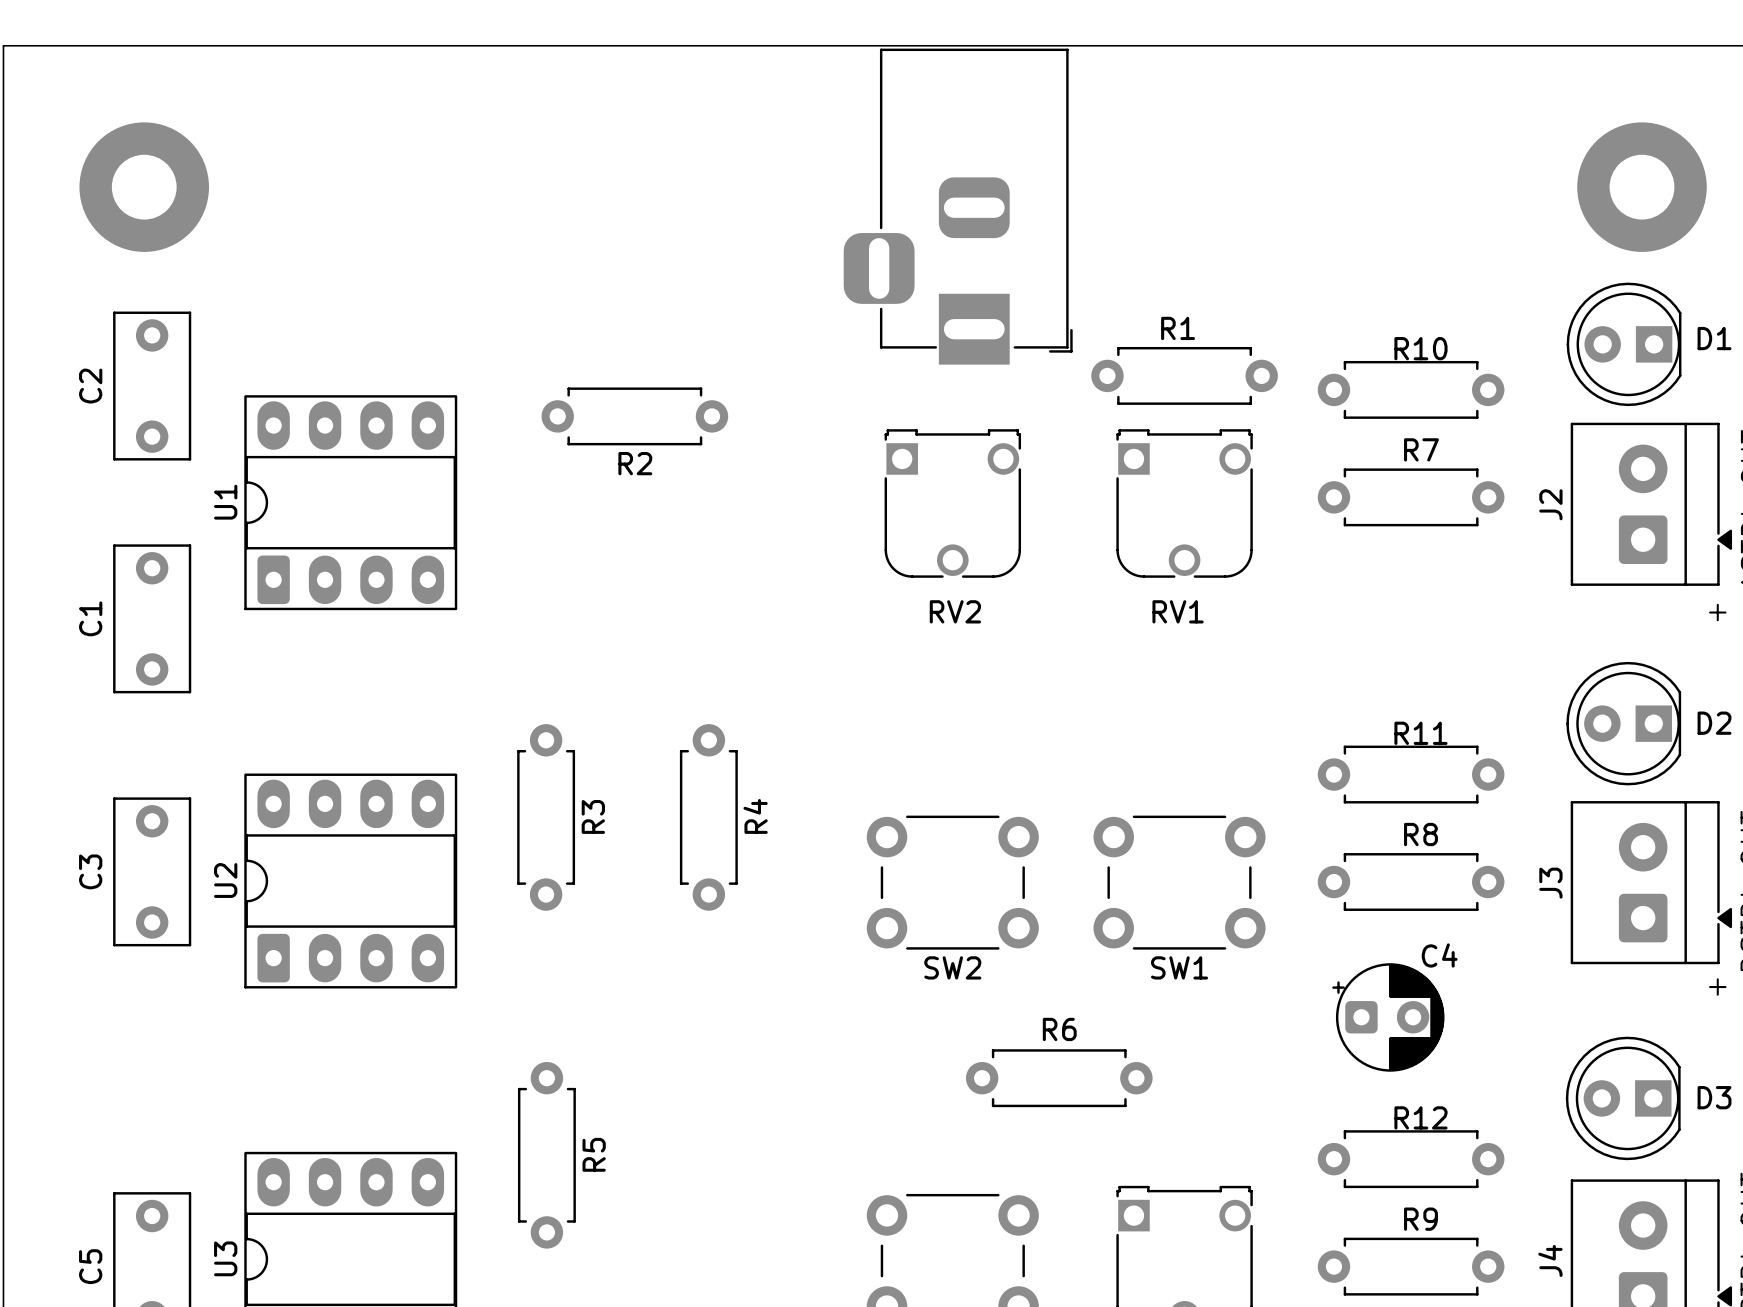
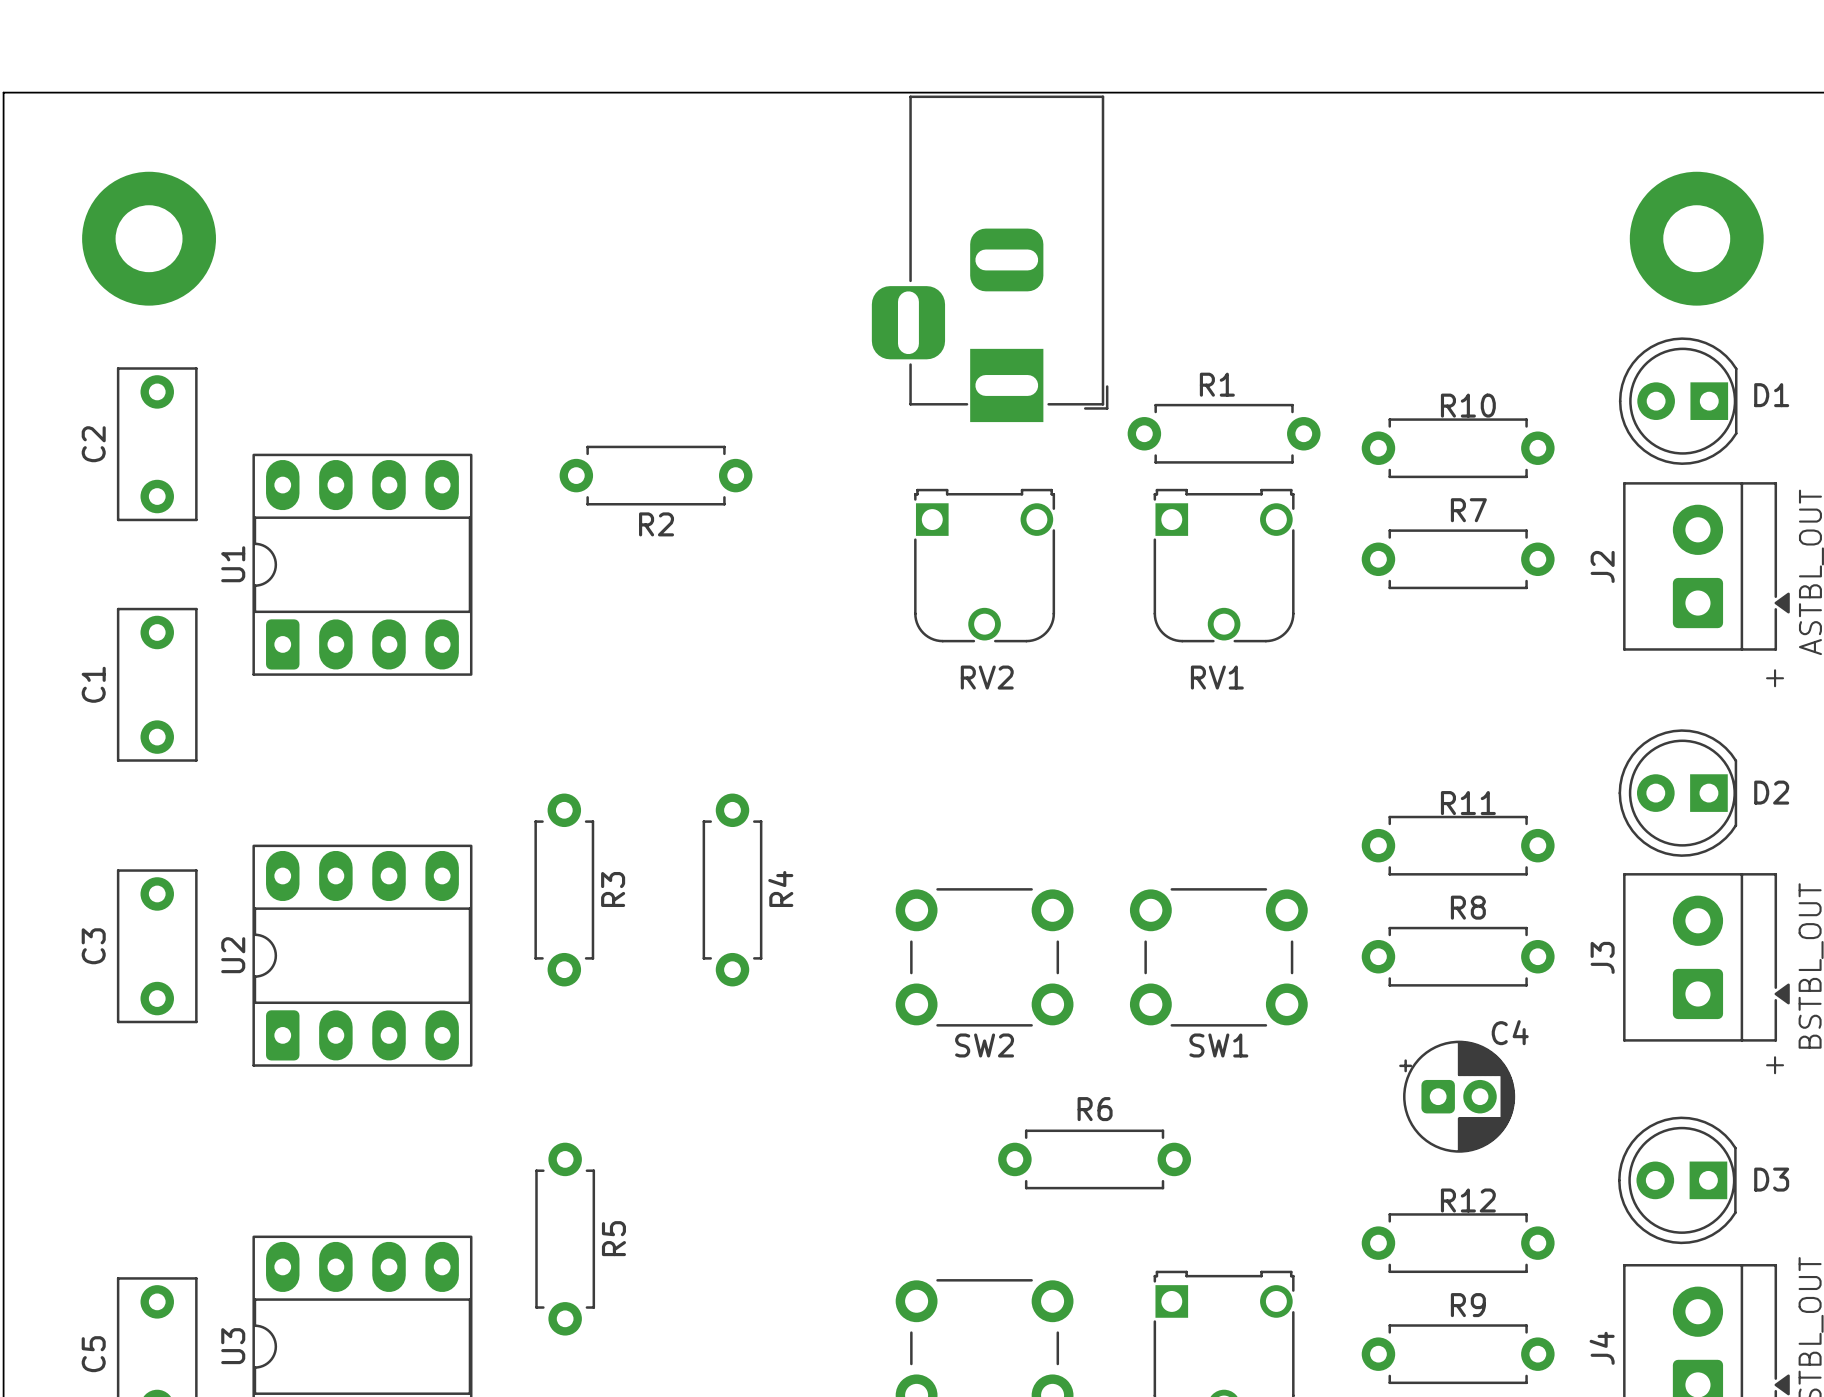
C4 footprint: [1332, 963, 1445, 1072] -> [1399, 1040, 1516, 1153]

